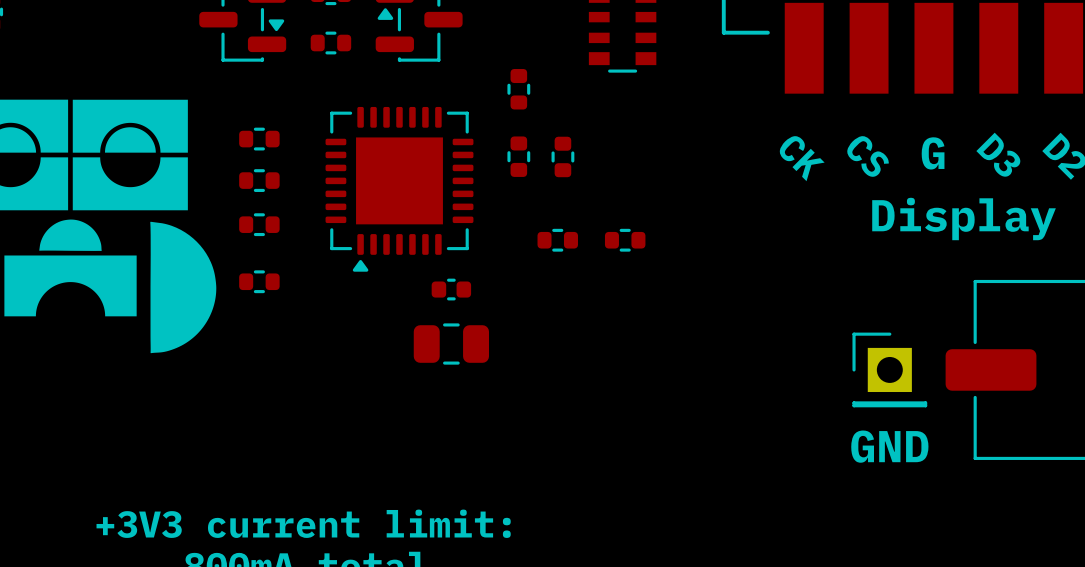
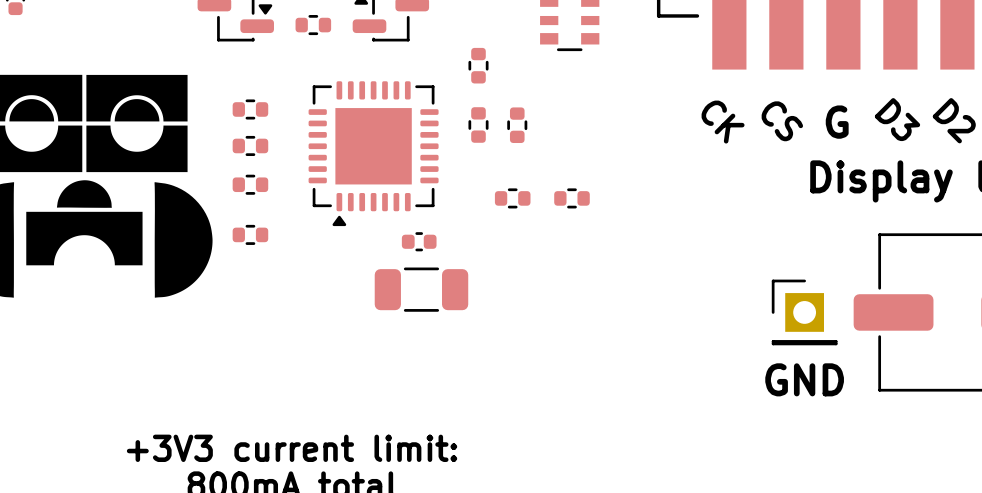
part footprint: [413, 323, 490, 365] -> [374, 267, 469, 312]

